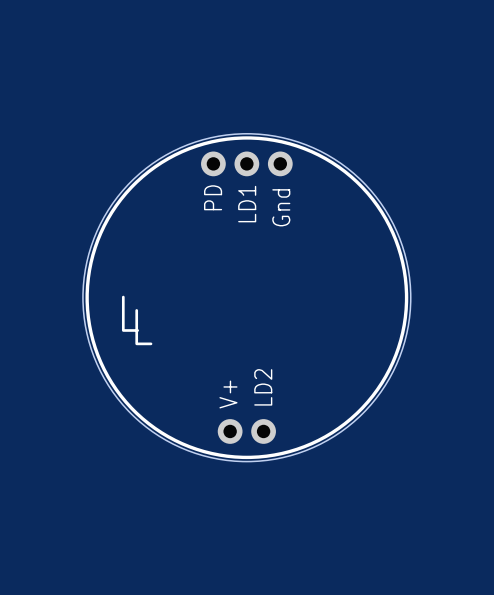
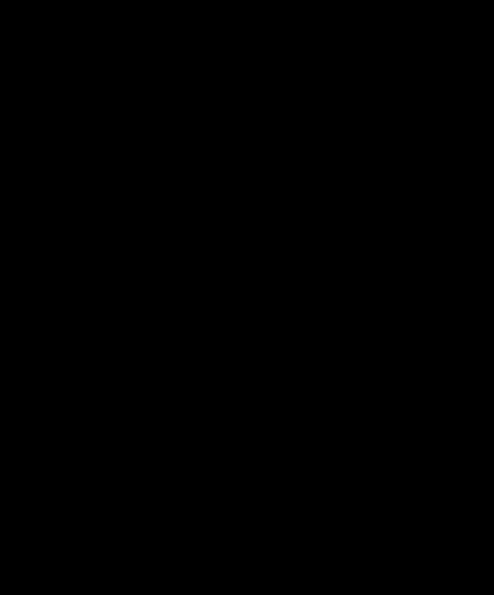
round board edge: [82, 133, 412, 462] -> none
drawing: [121, 295, 153, 346] -> none
part: (246, 297) -> none

